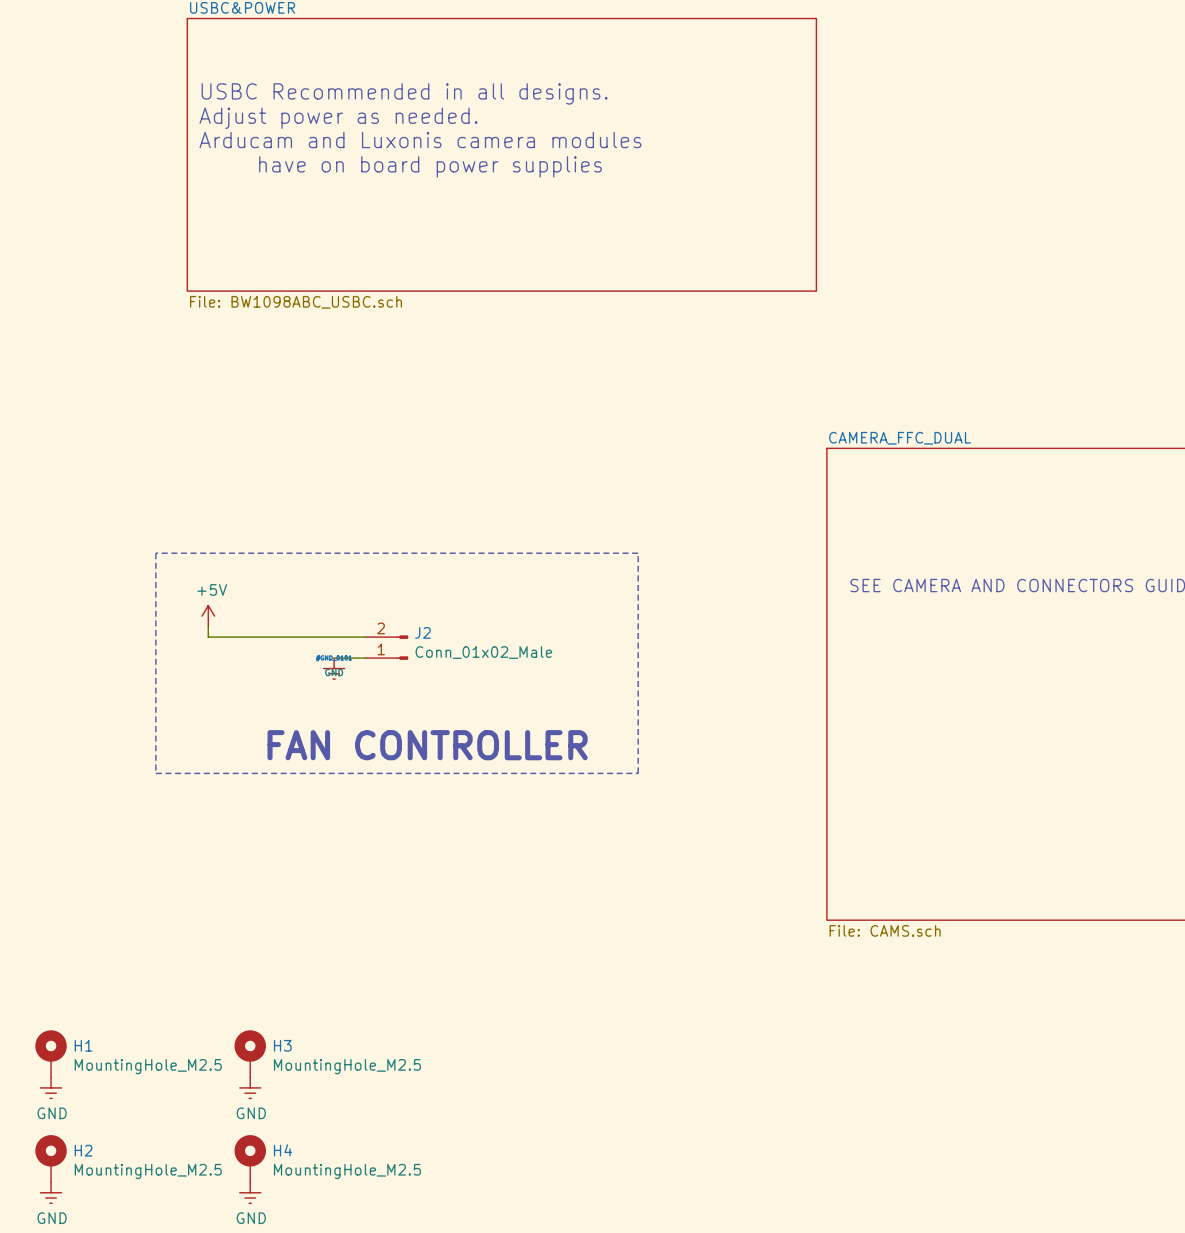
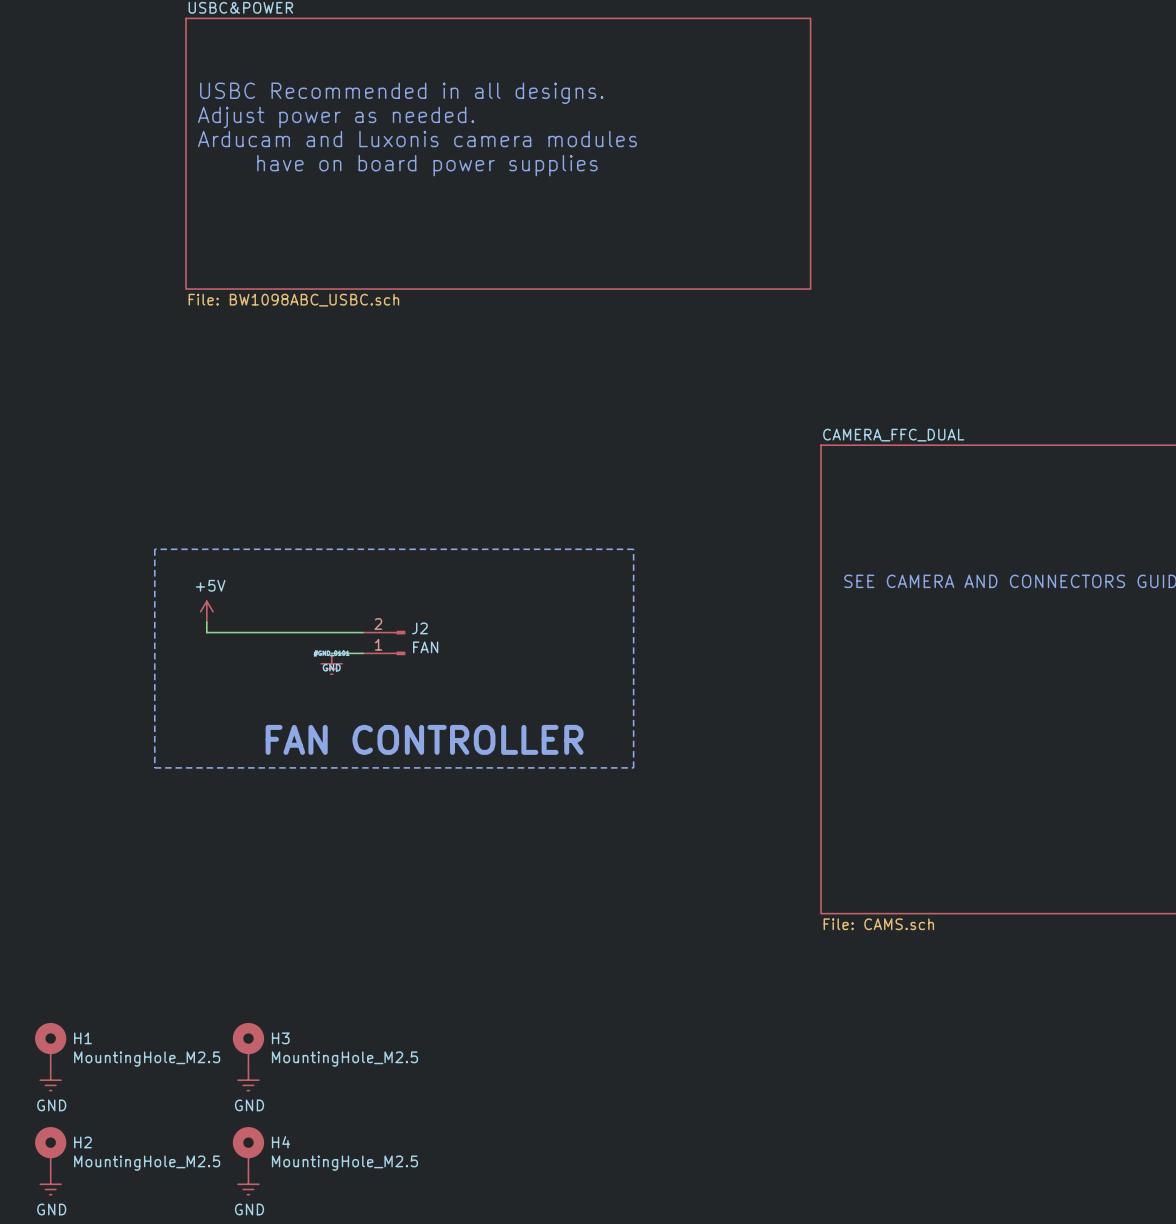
J2 value: Conn_01x02_Male (483, 652) -> FAN (425, 647)

